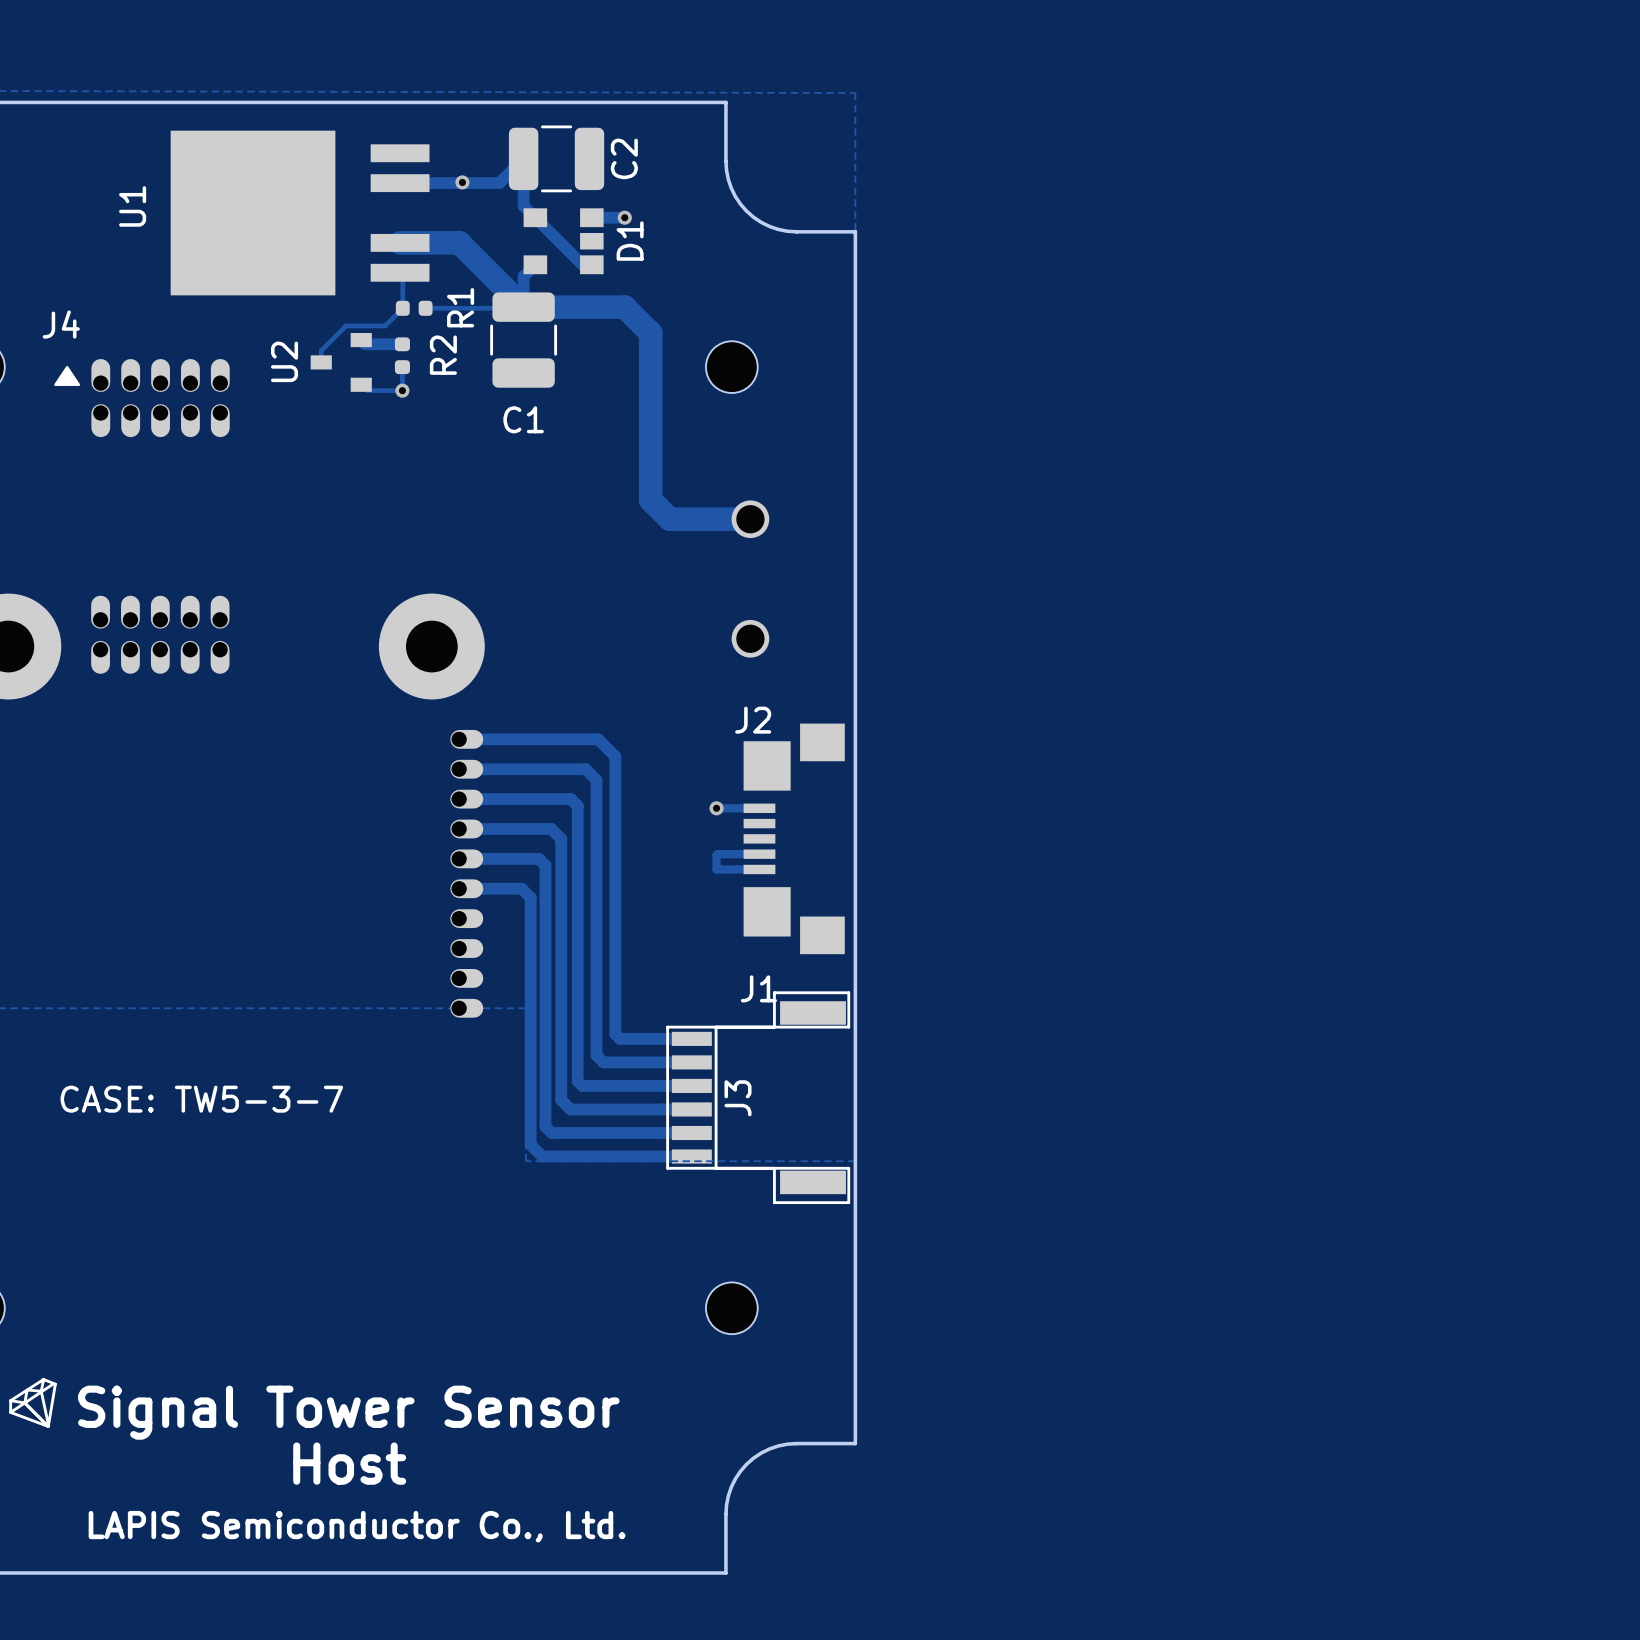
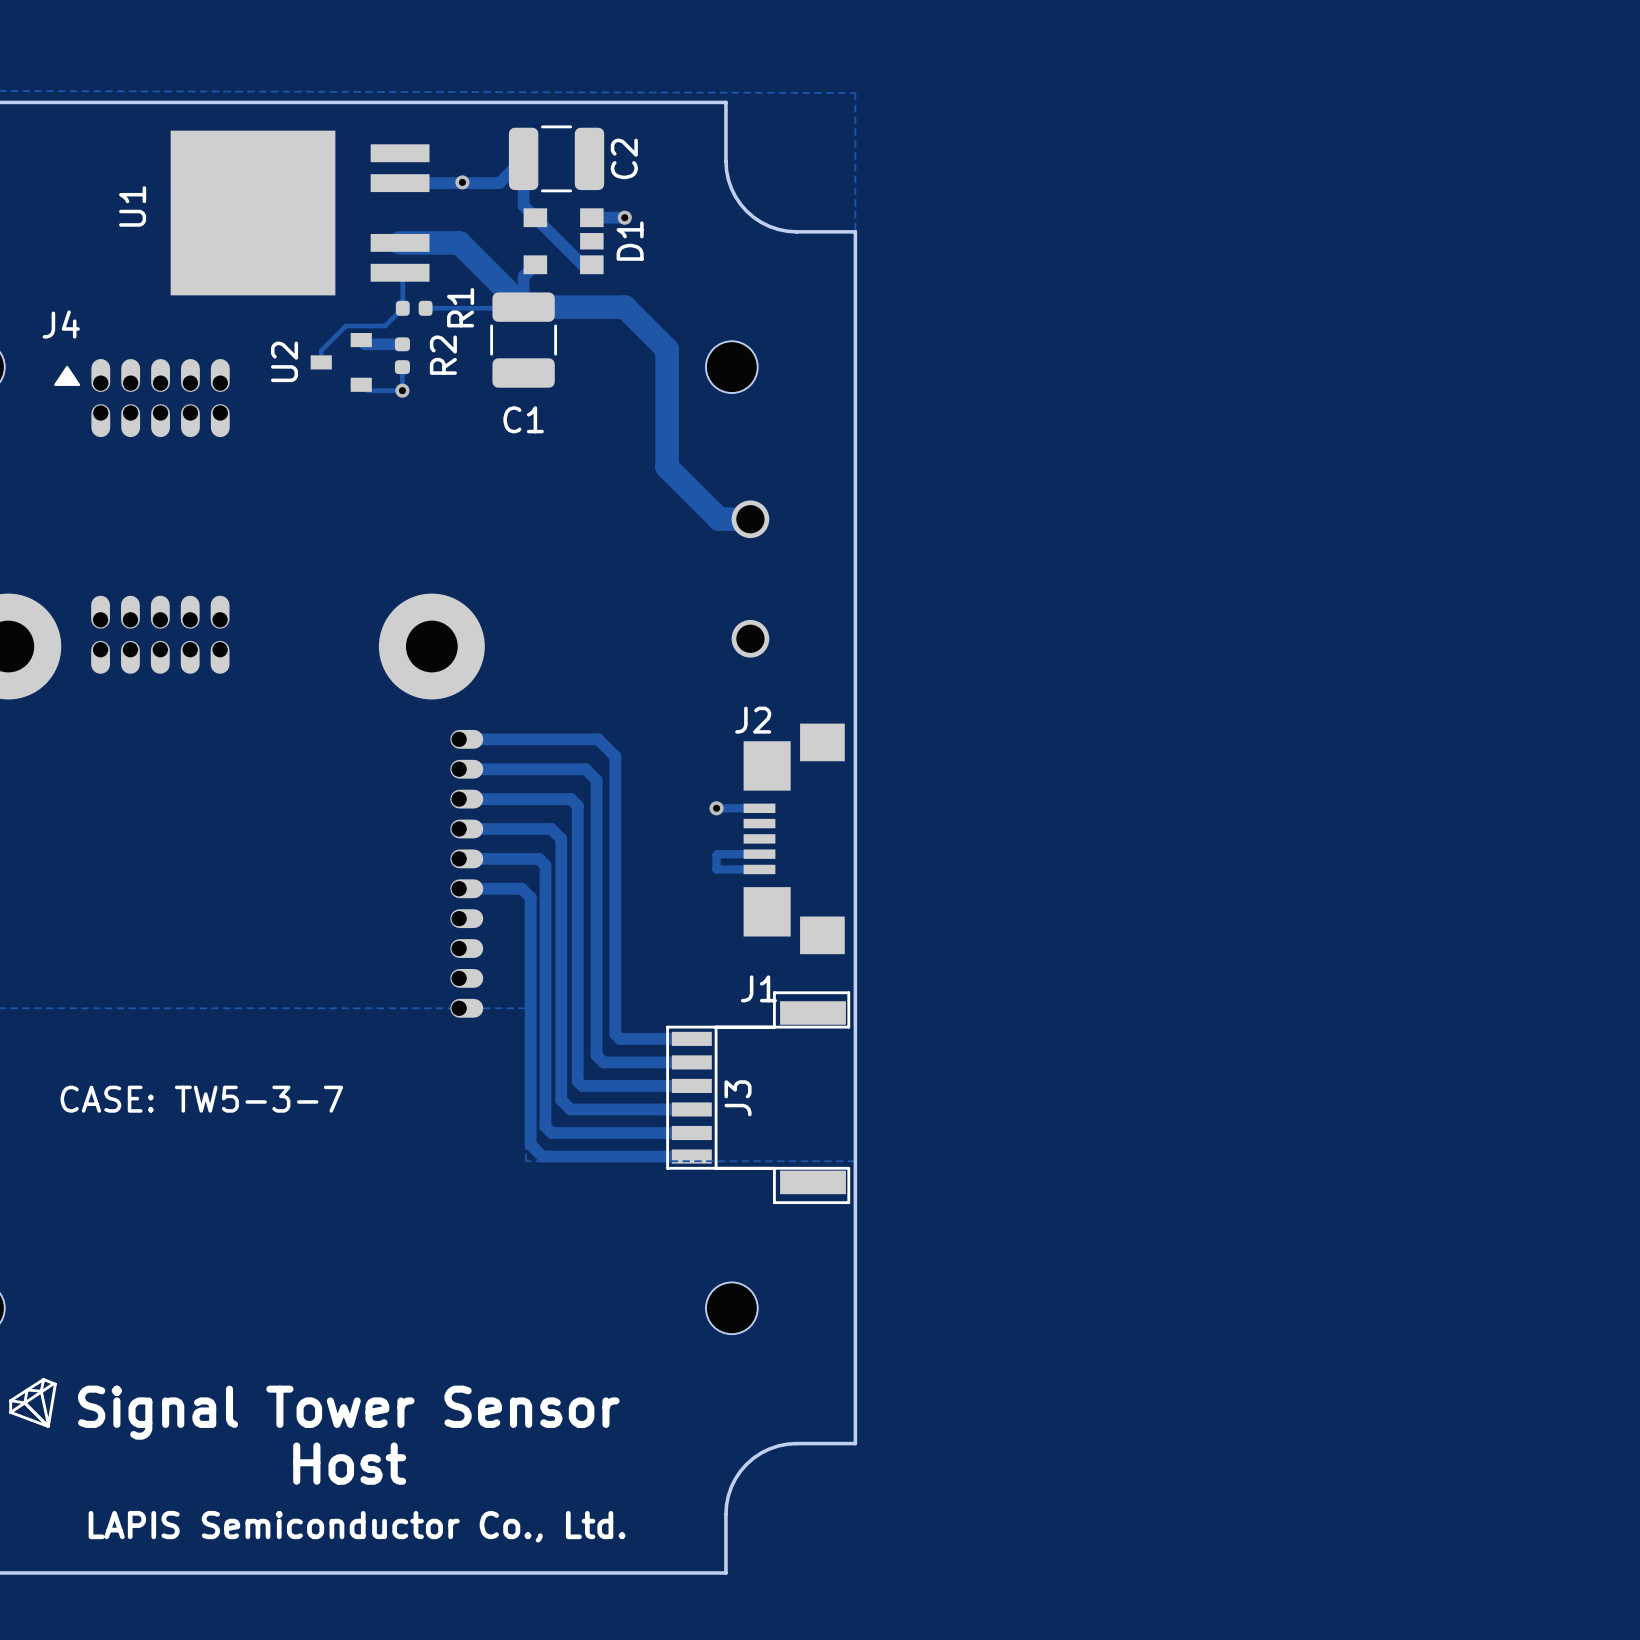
track: (650, 333) (650, 500) (669, 519) (719, 519) -> (650, 333) (667, 349) (667, 467) (719, 519)

